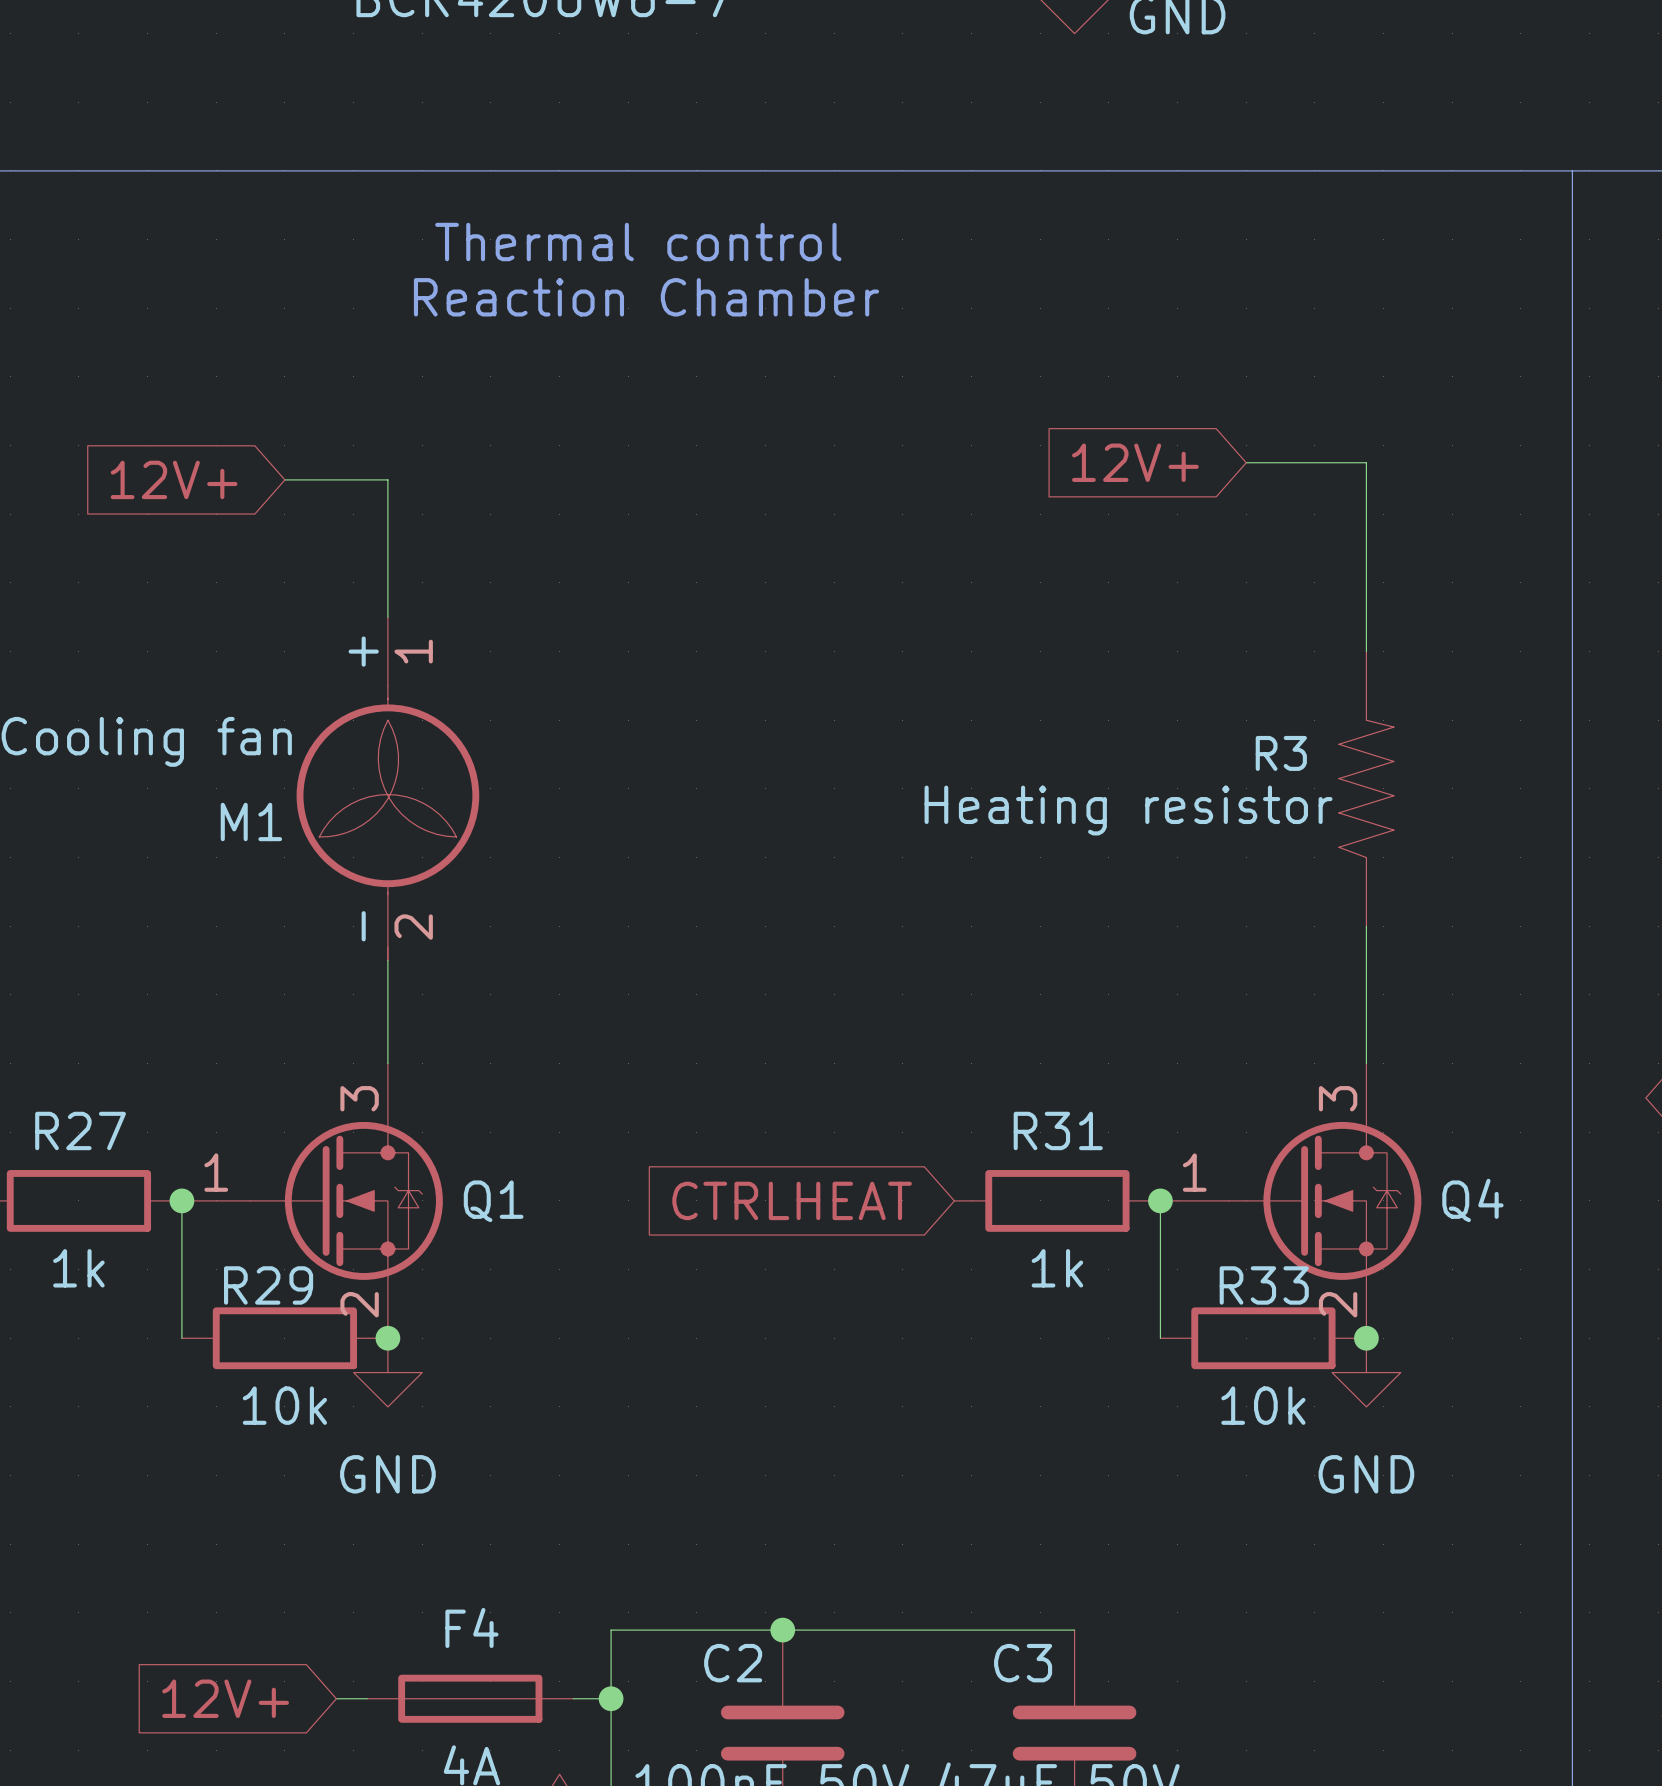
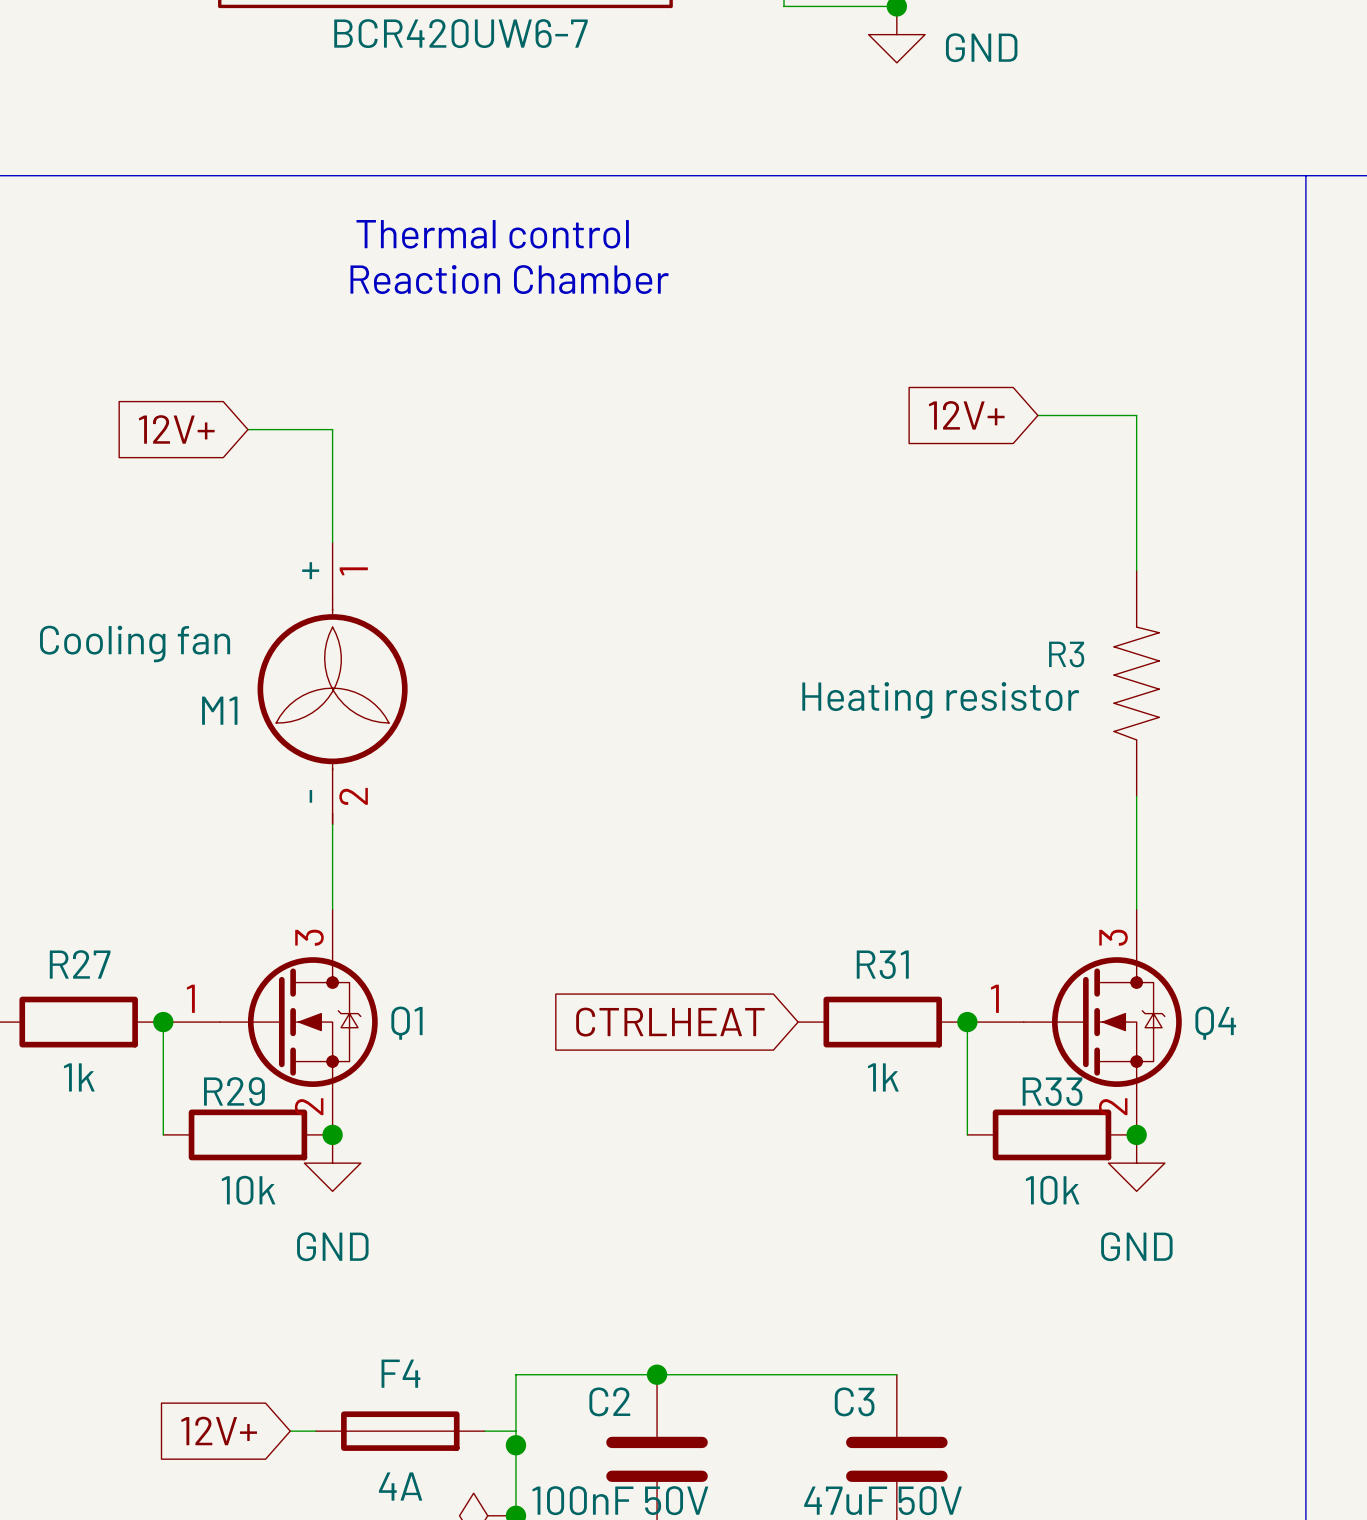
junction position: (611, 1698) -> (515, 1445)

